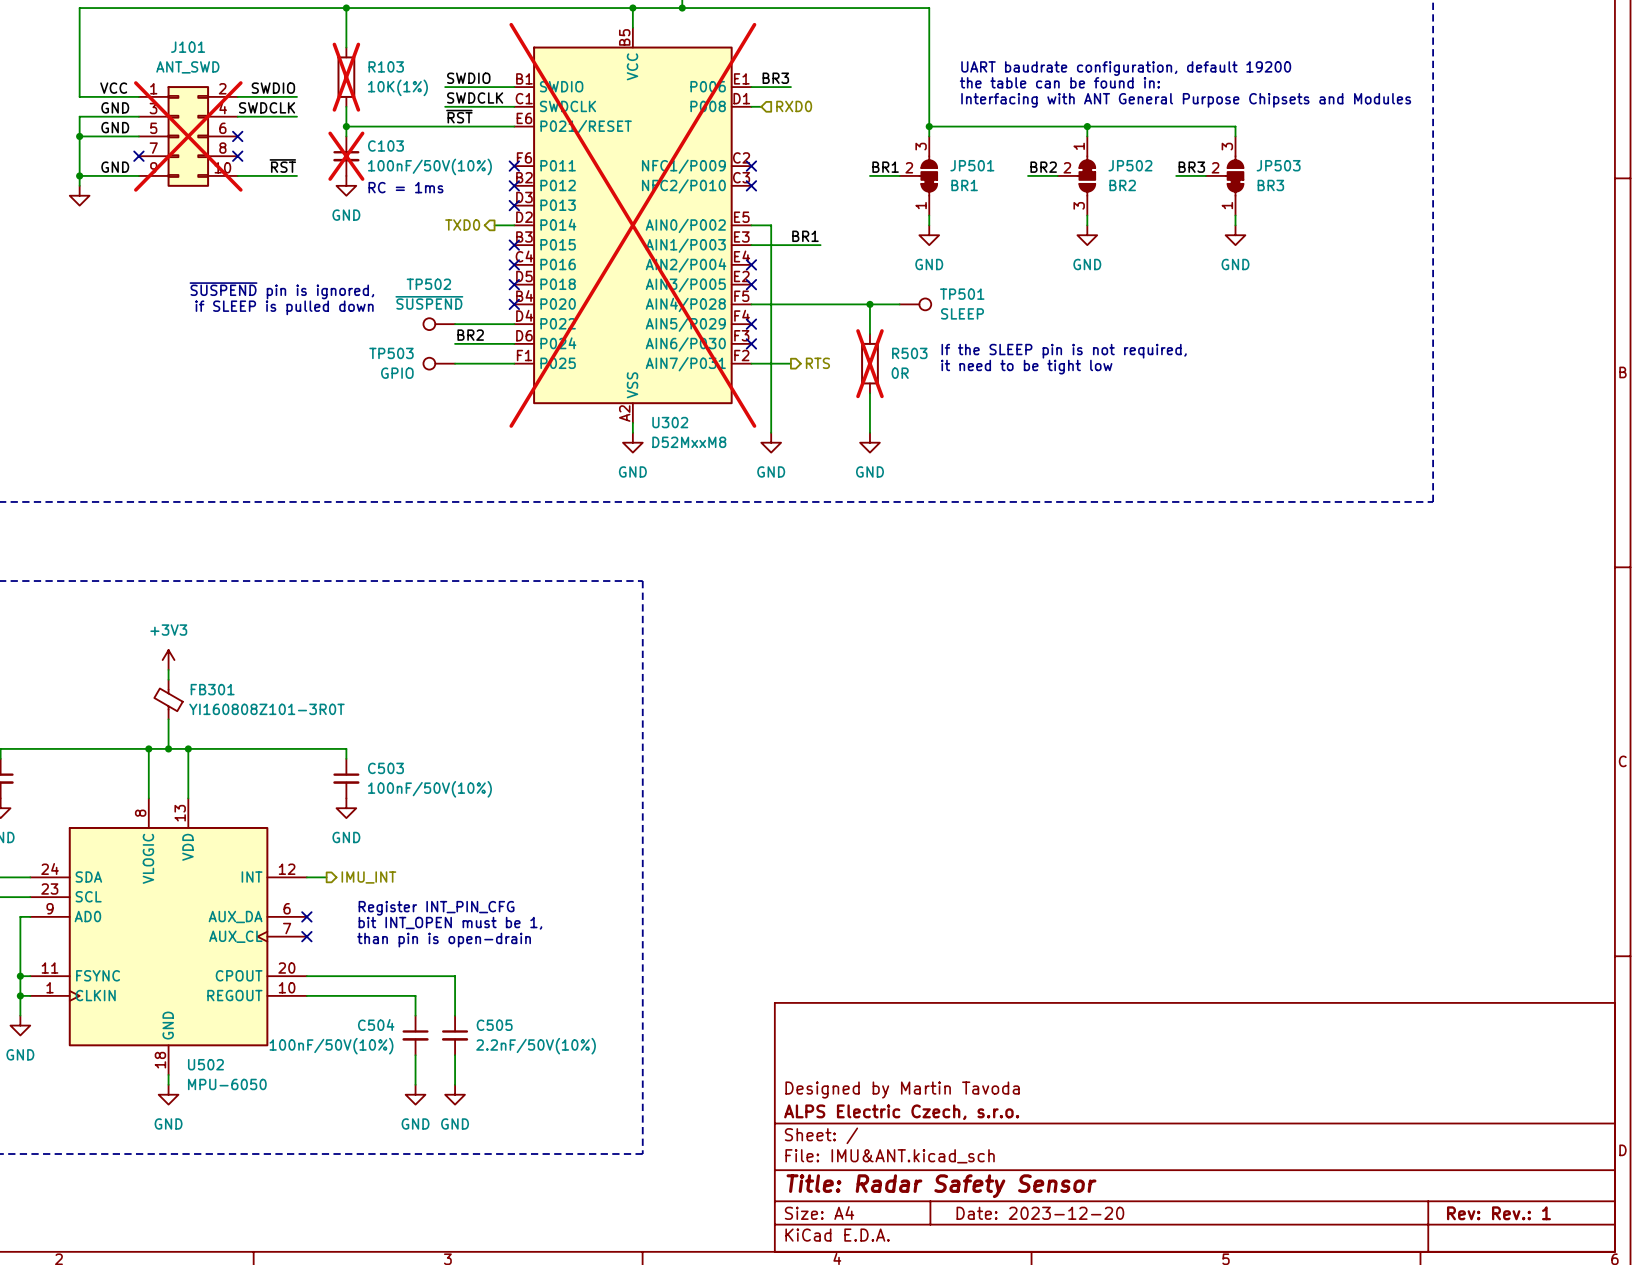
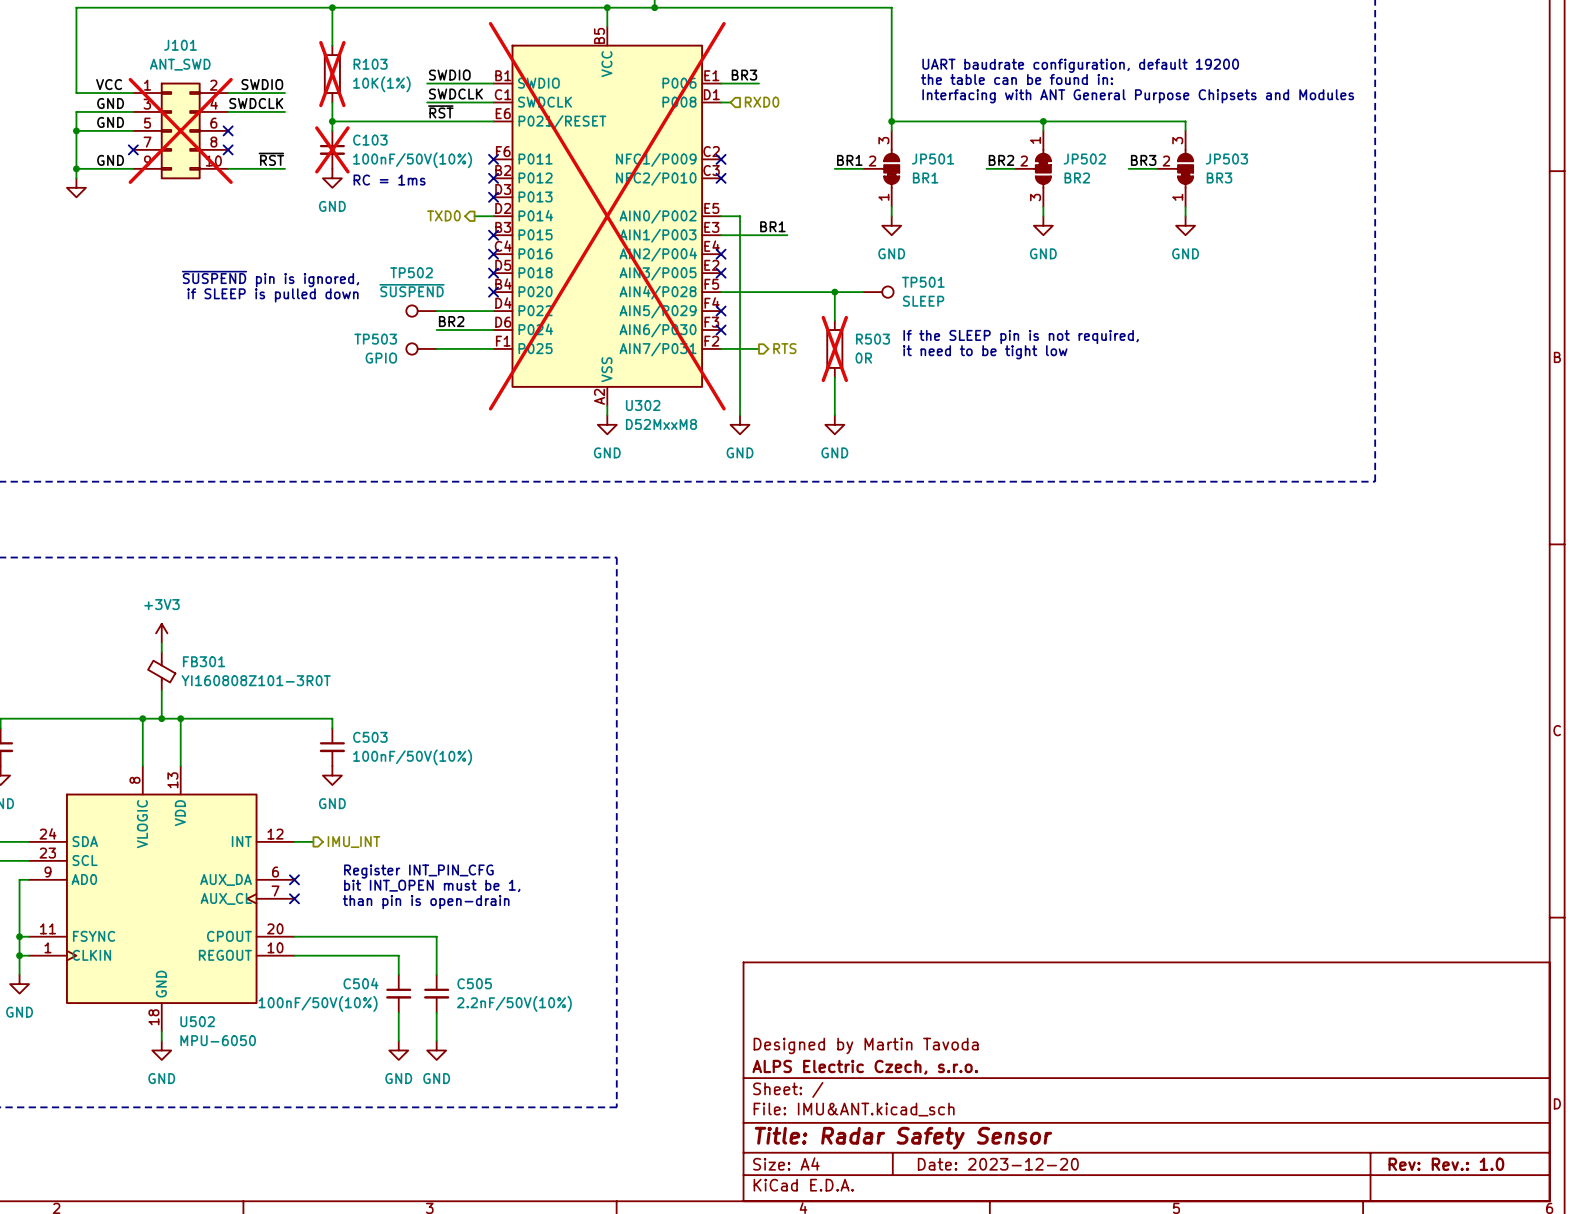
title block: Rev: Rev.: 1 (1498, 1213) -> Rev: Rev.: 1.0 (1446, 1164)

